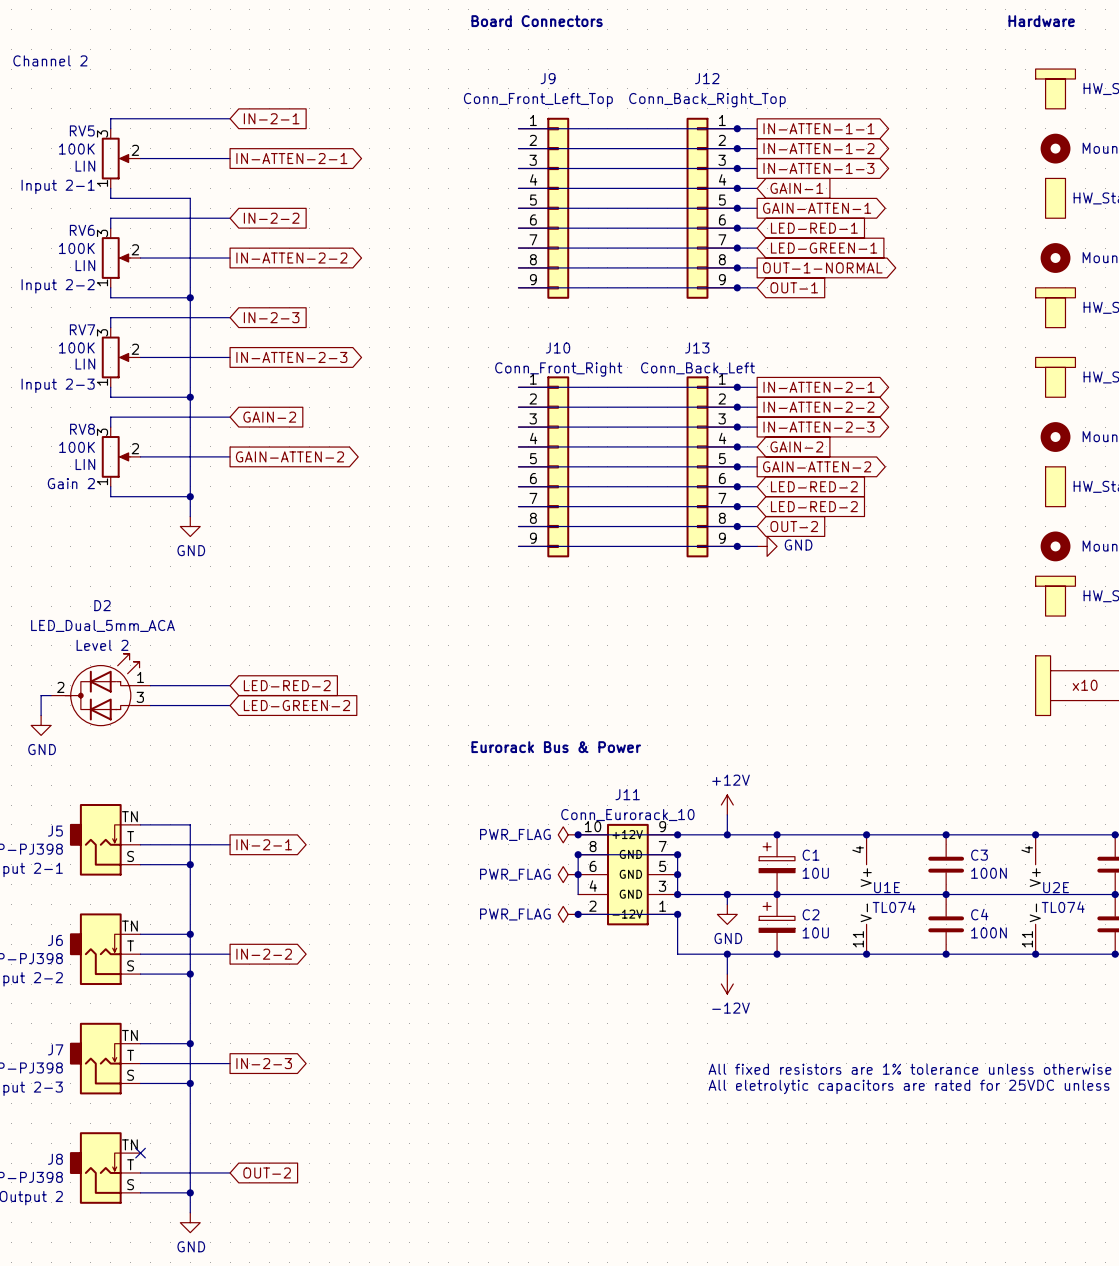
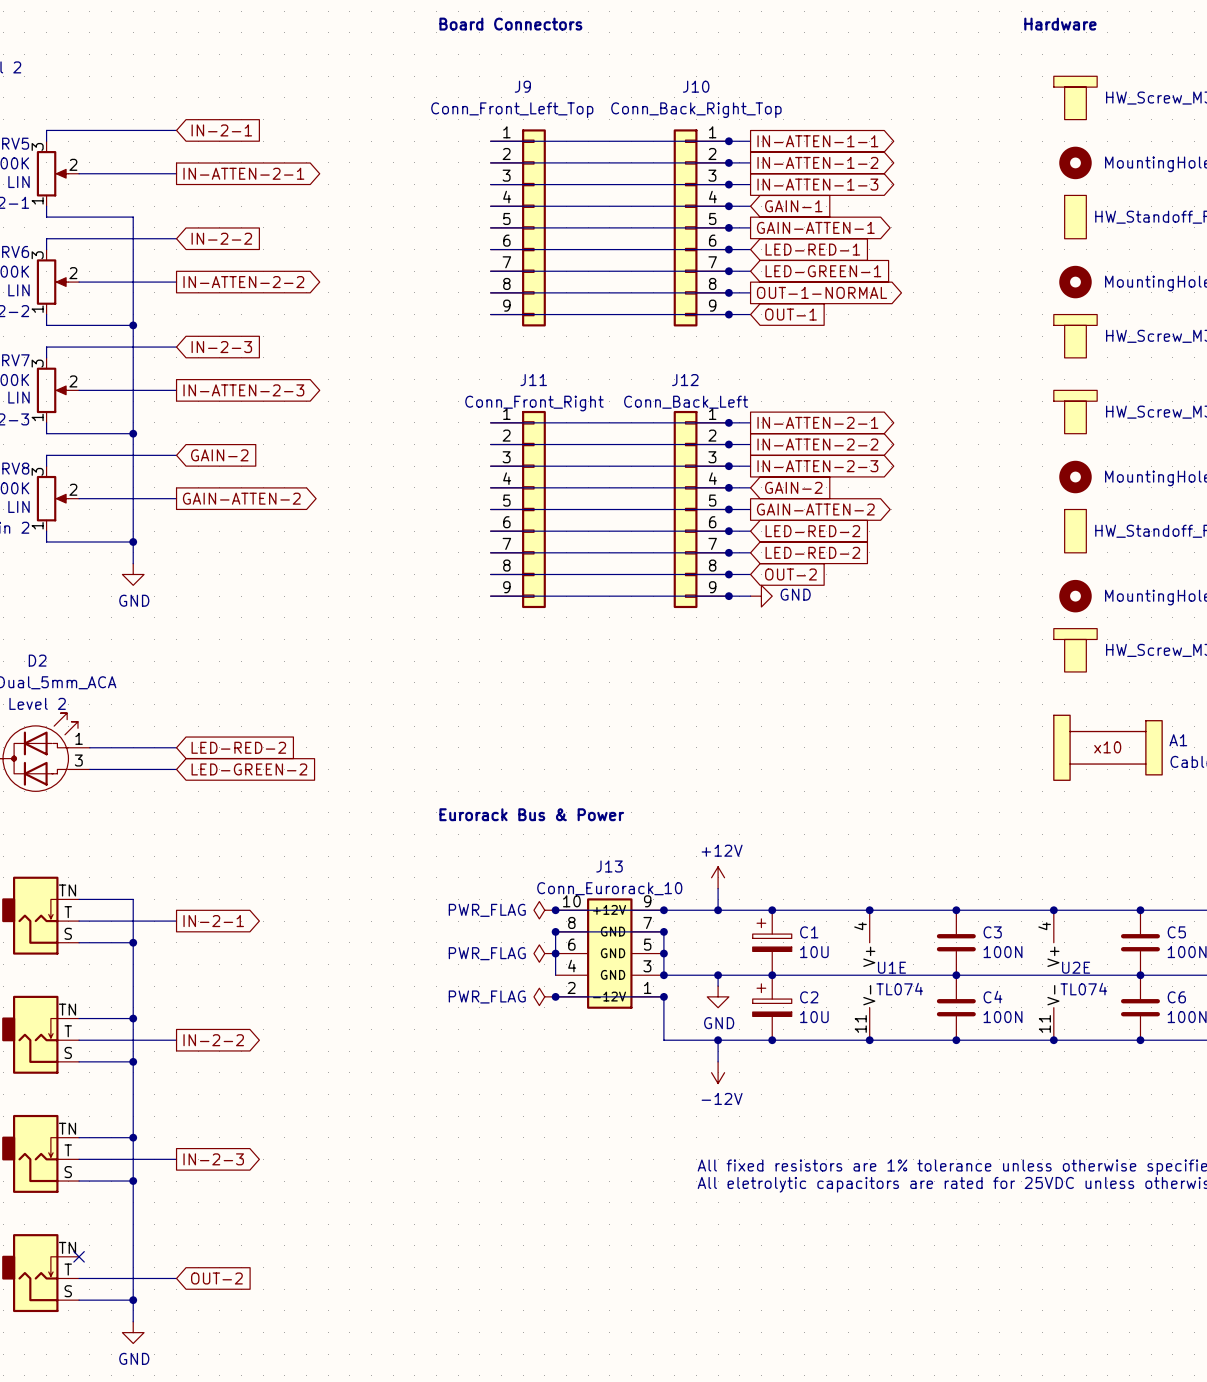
J12 name: J12 (707, 78) -> J10 (696, 86)
J10 name: J10 (558, 348) -> J11 (533, 380)
J13 name: J13 (697, 348) -> J12 (685, 380)
J11 name: J11 (627, 794) -> J13 (609, 866)

